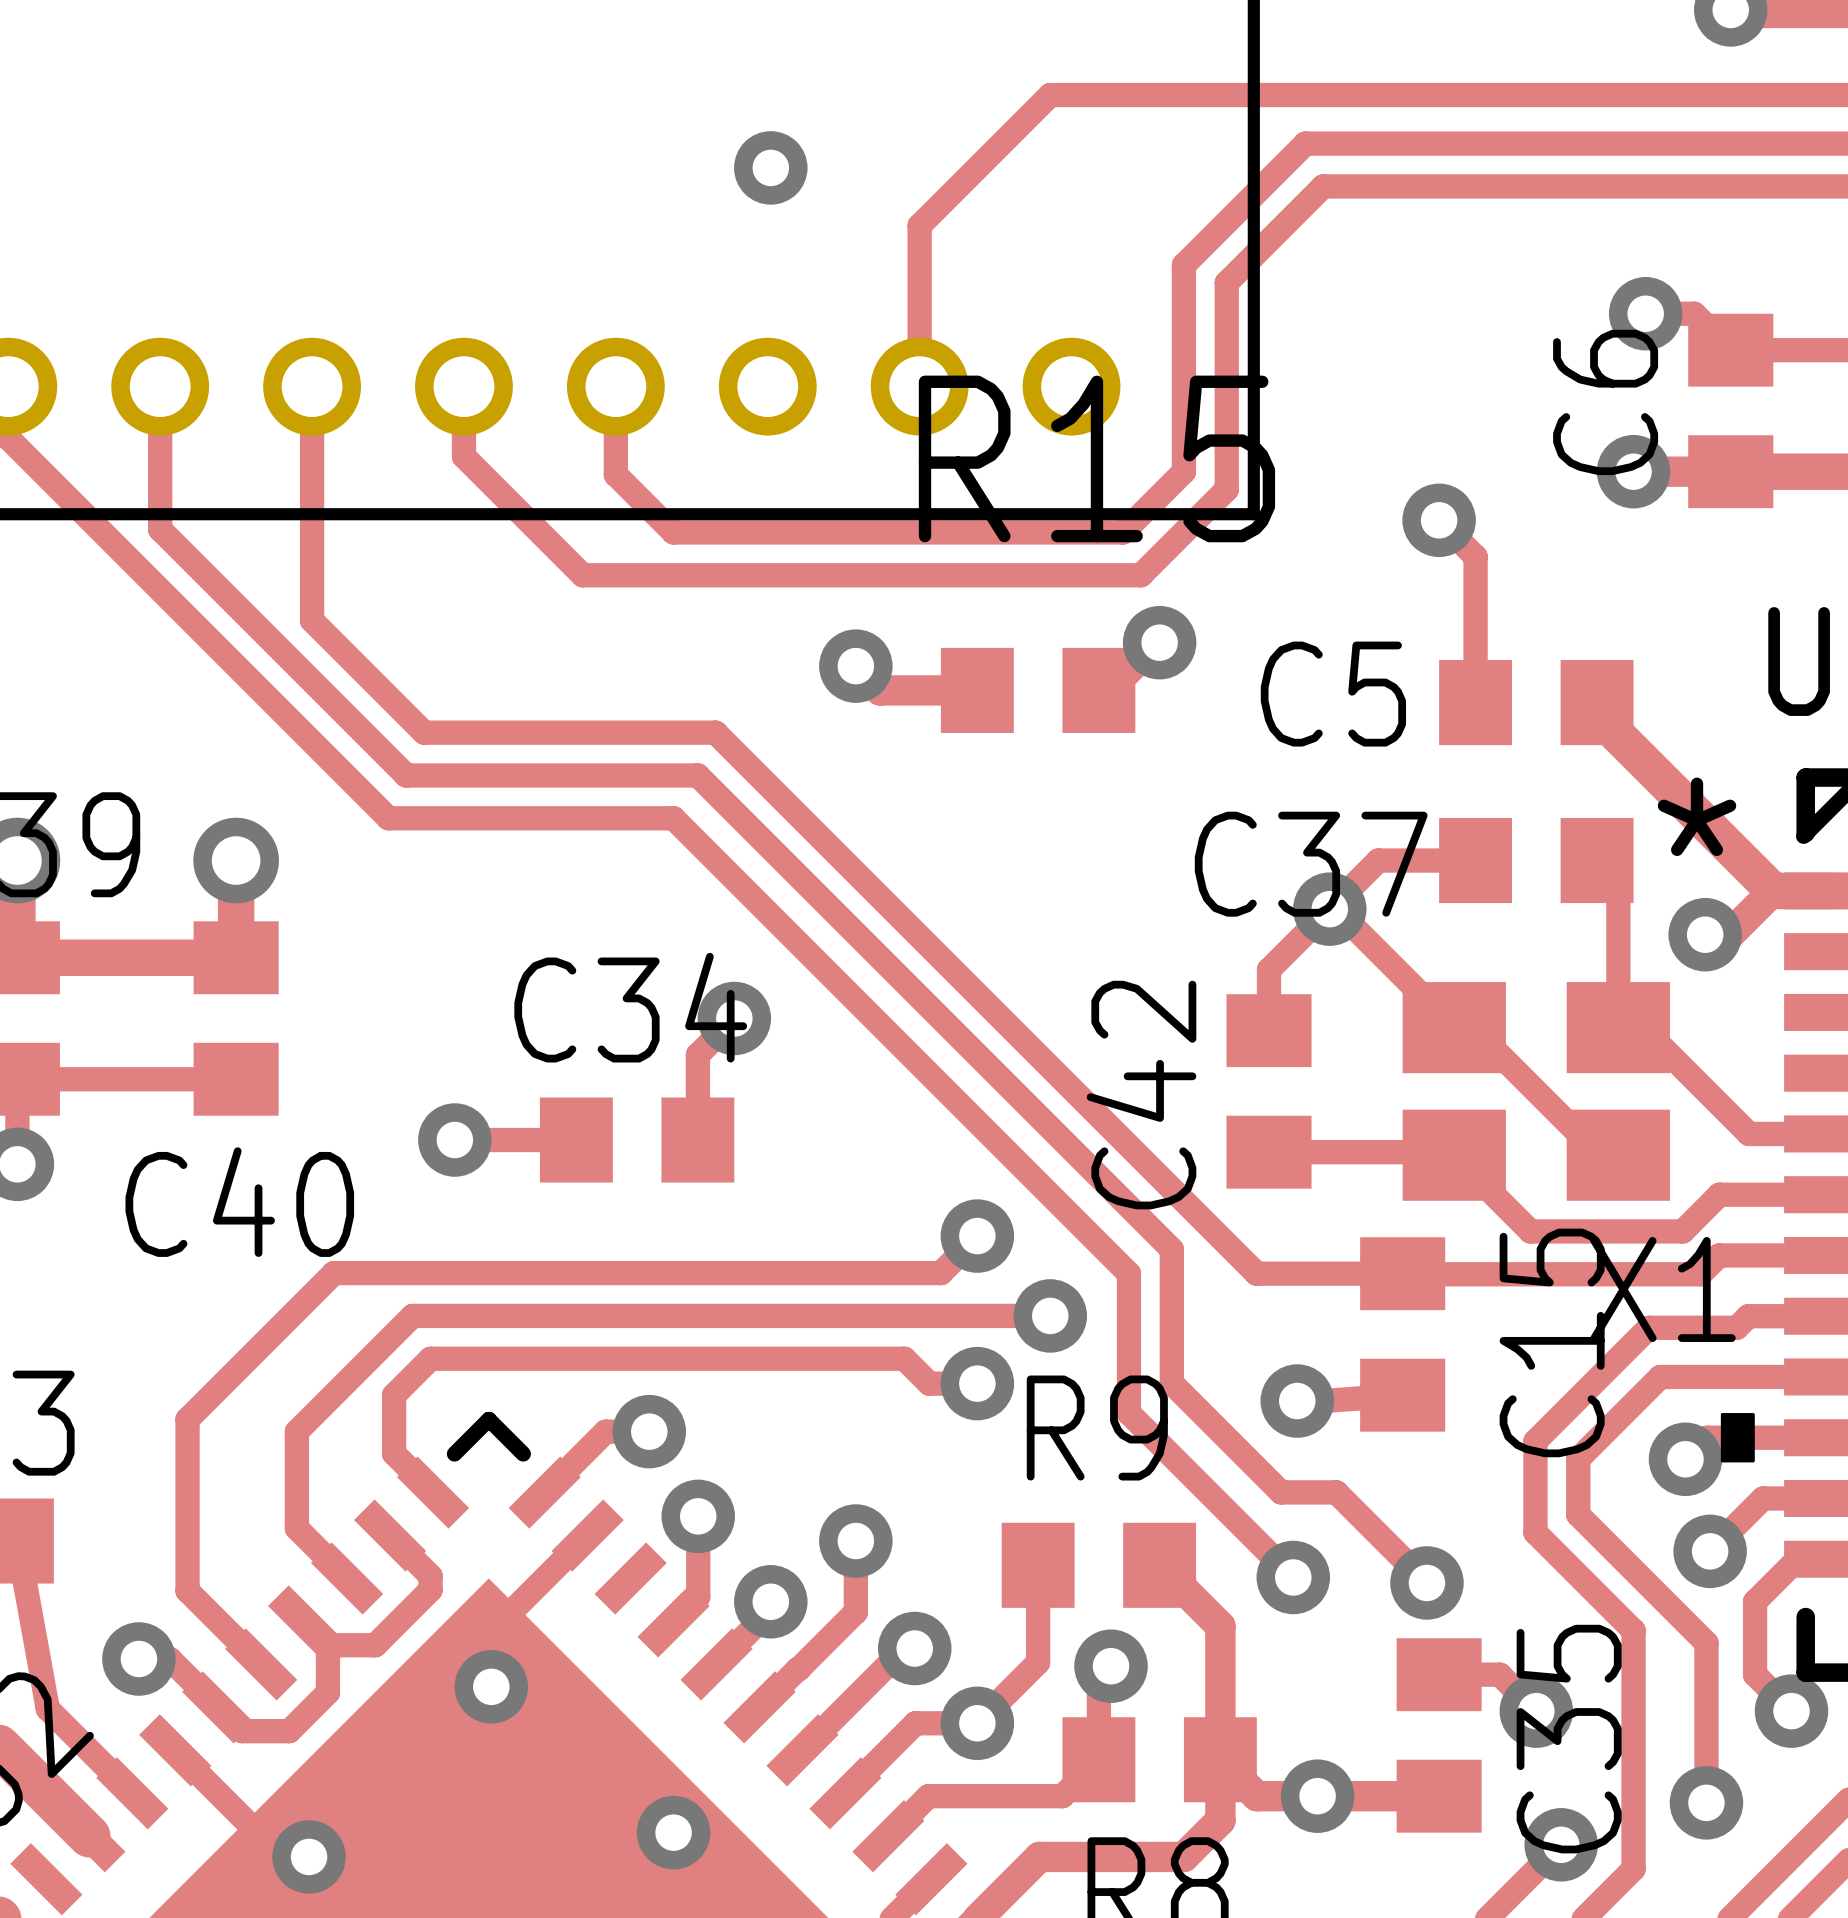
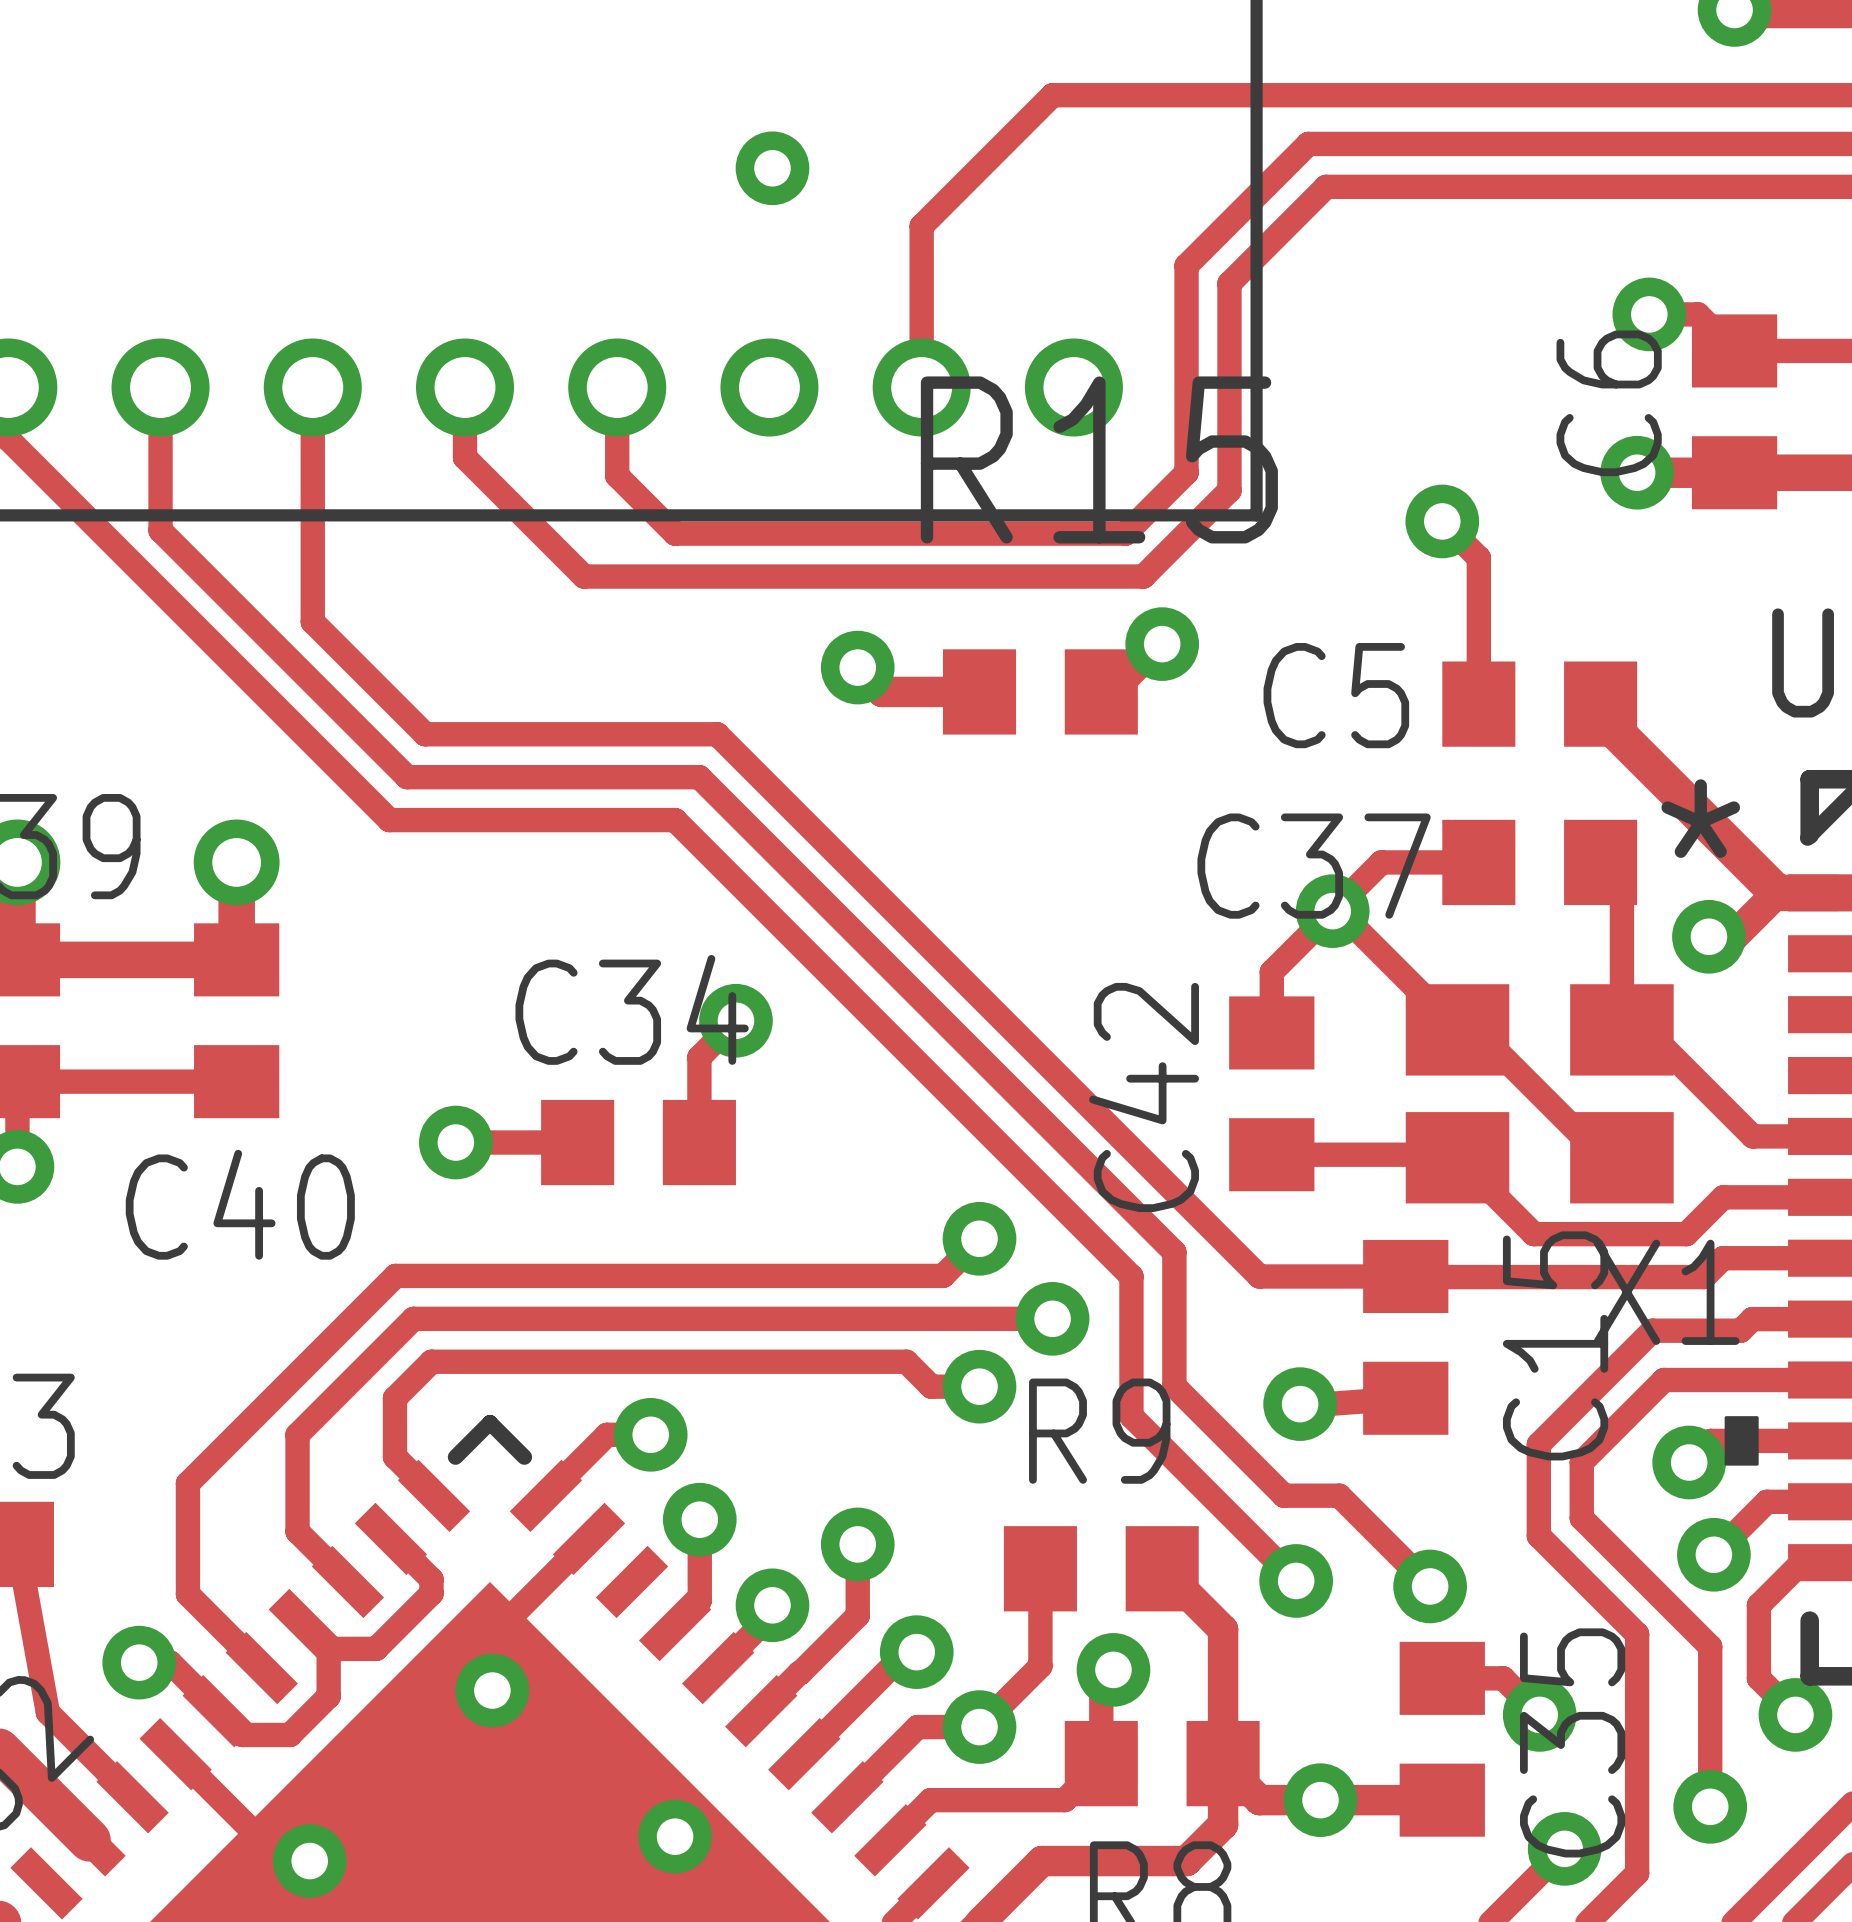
track: (394, 1273) (333, 1273) (187, 1419) (187, 1480) -> (395, 1275) (187, 1483)

